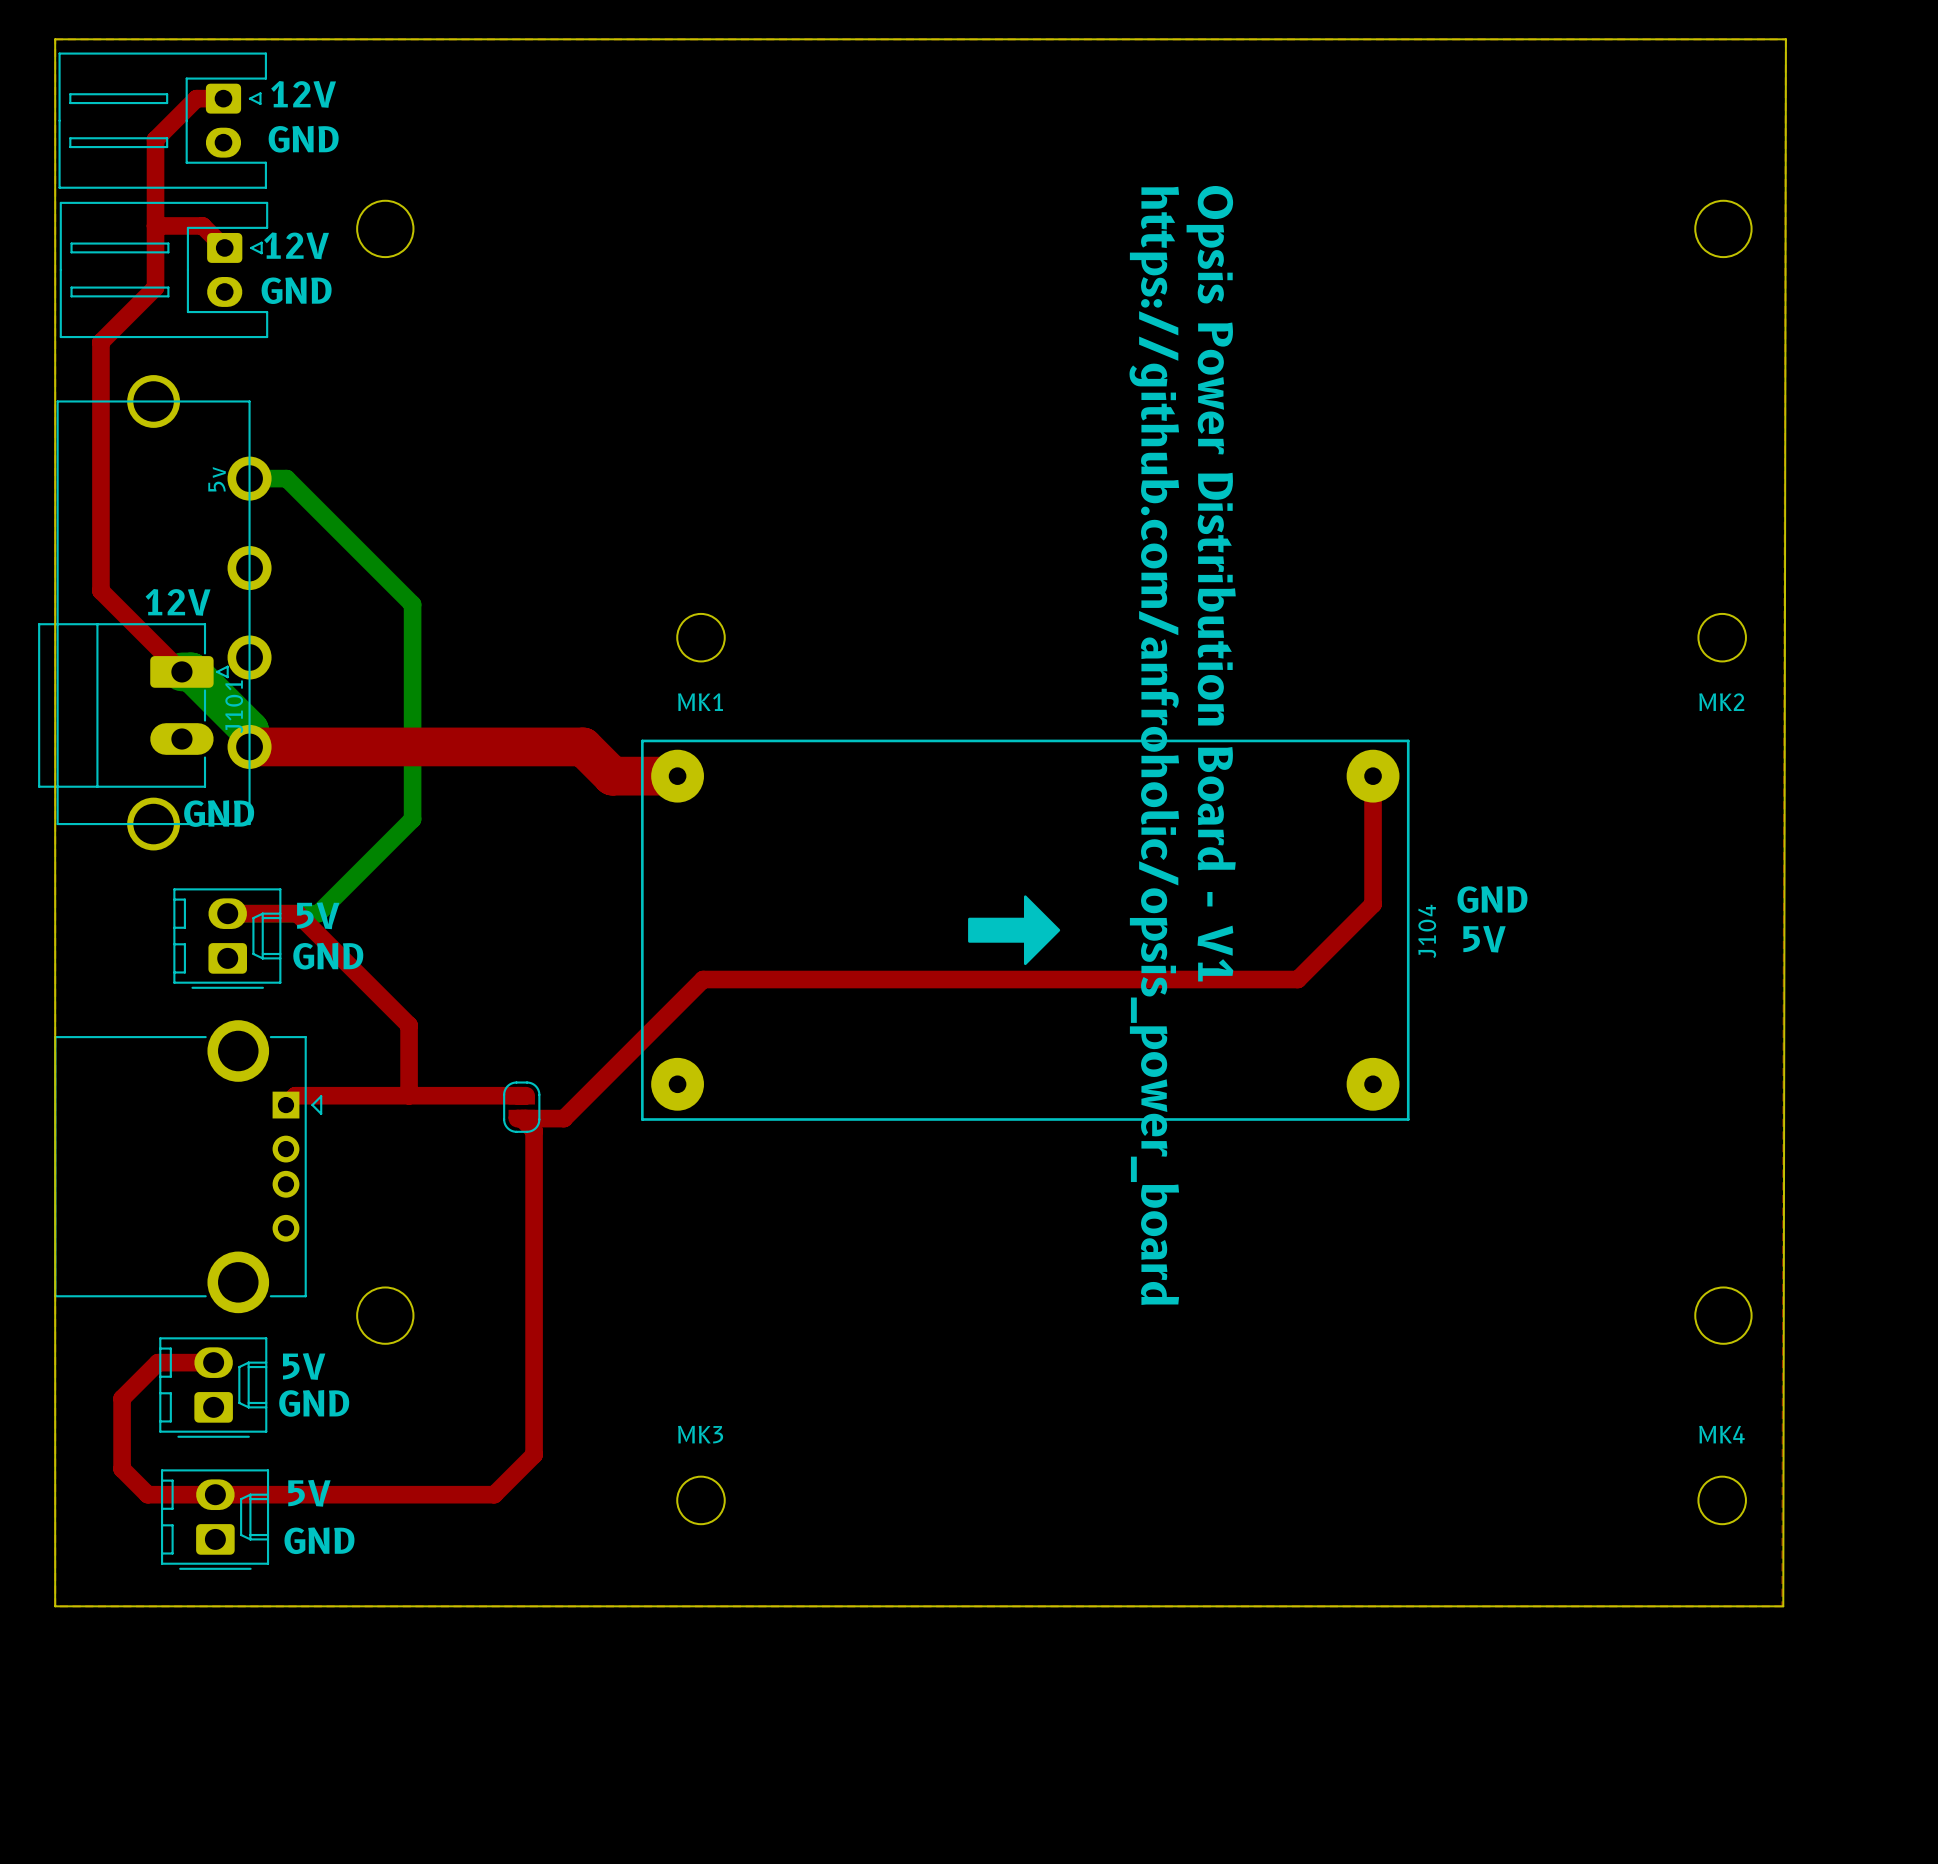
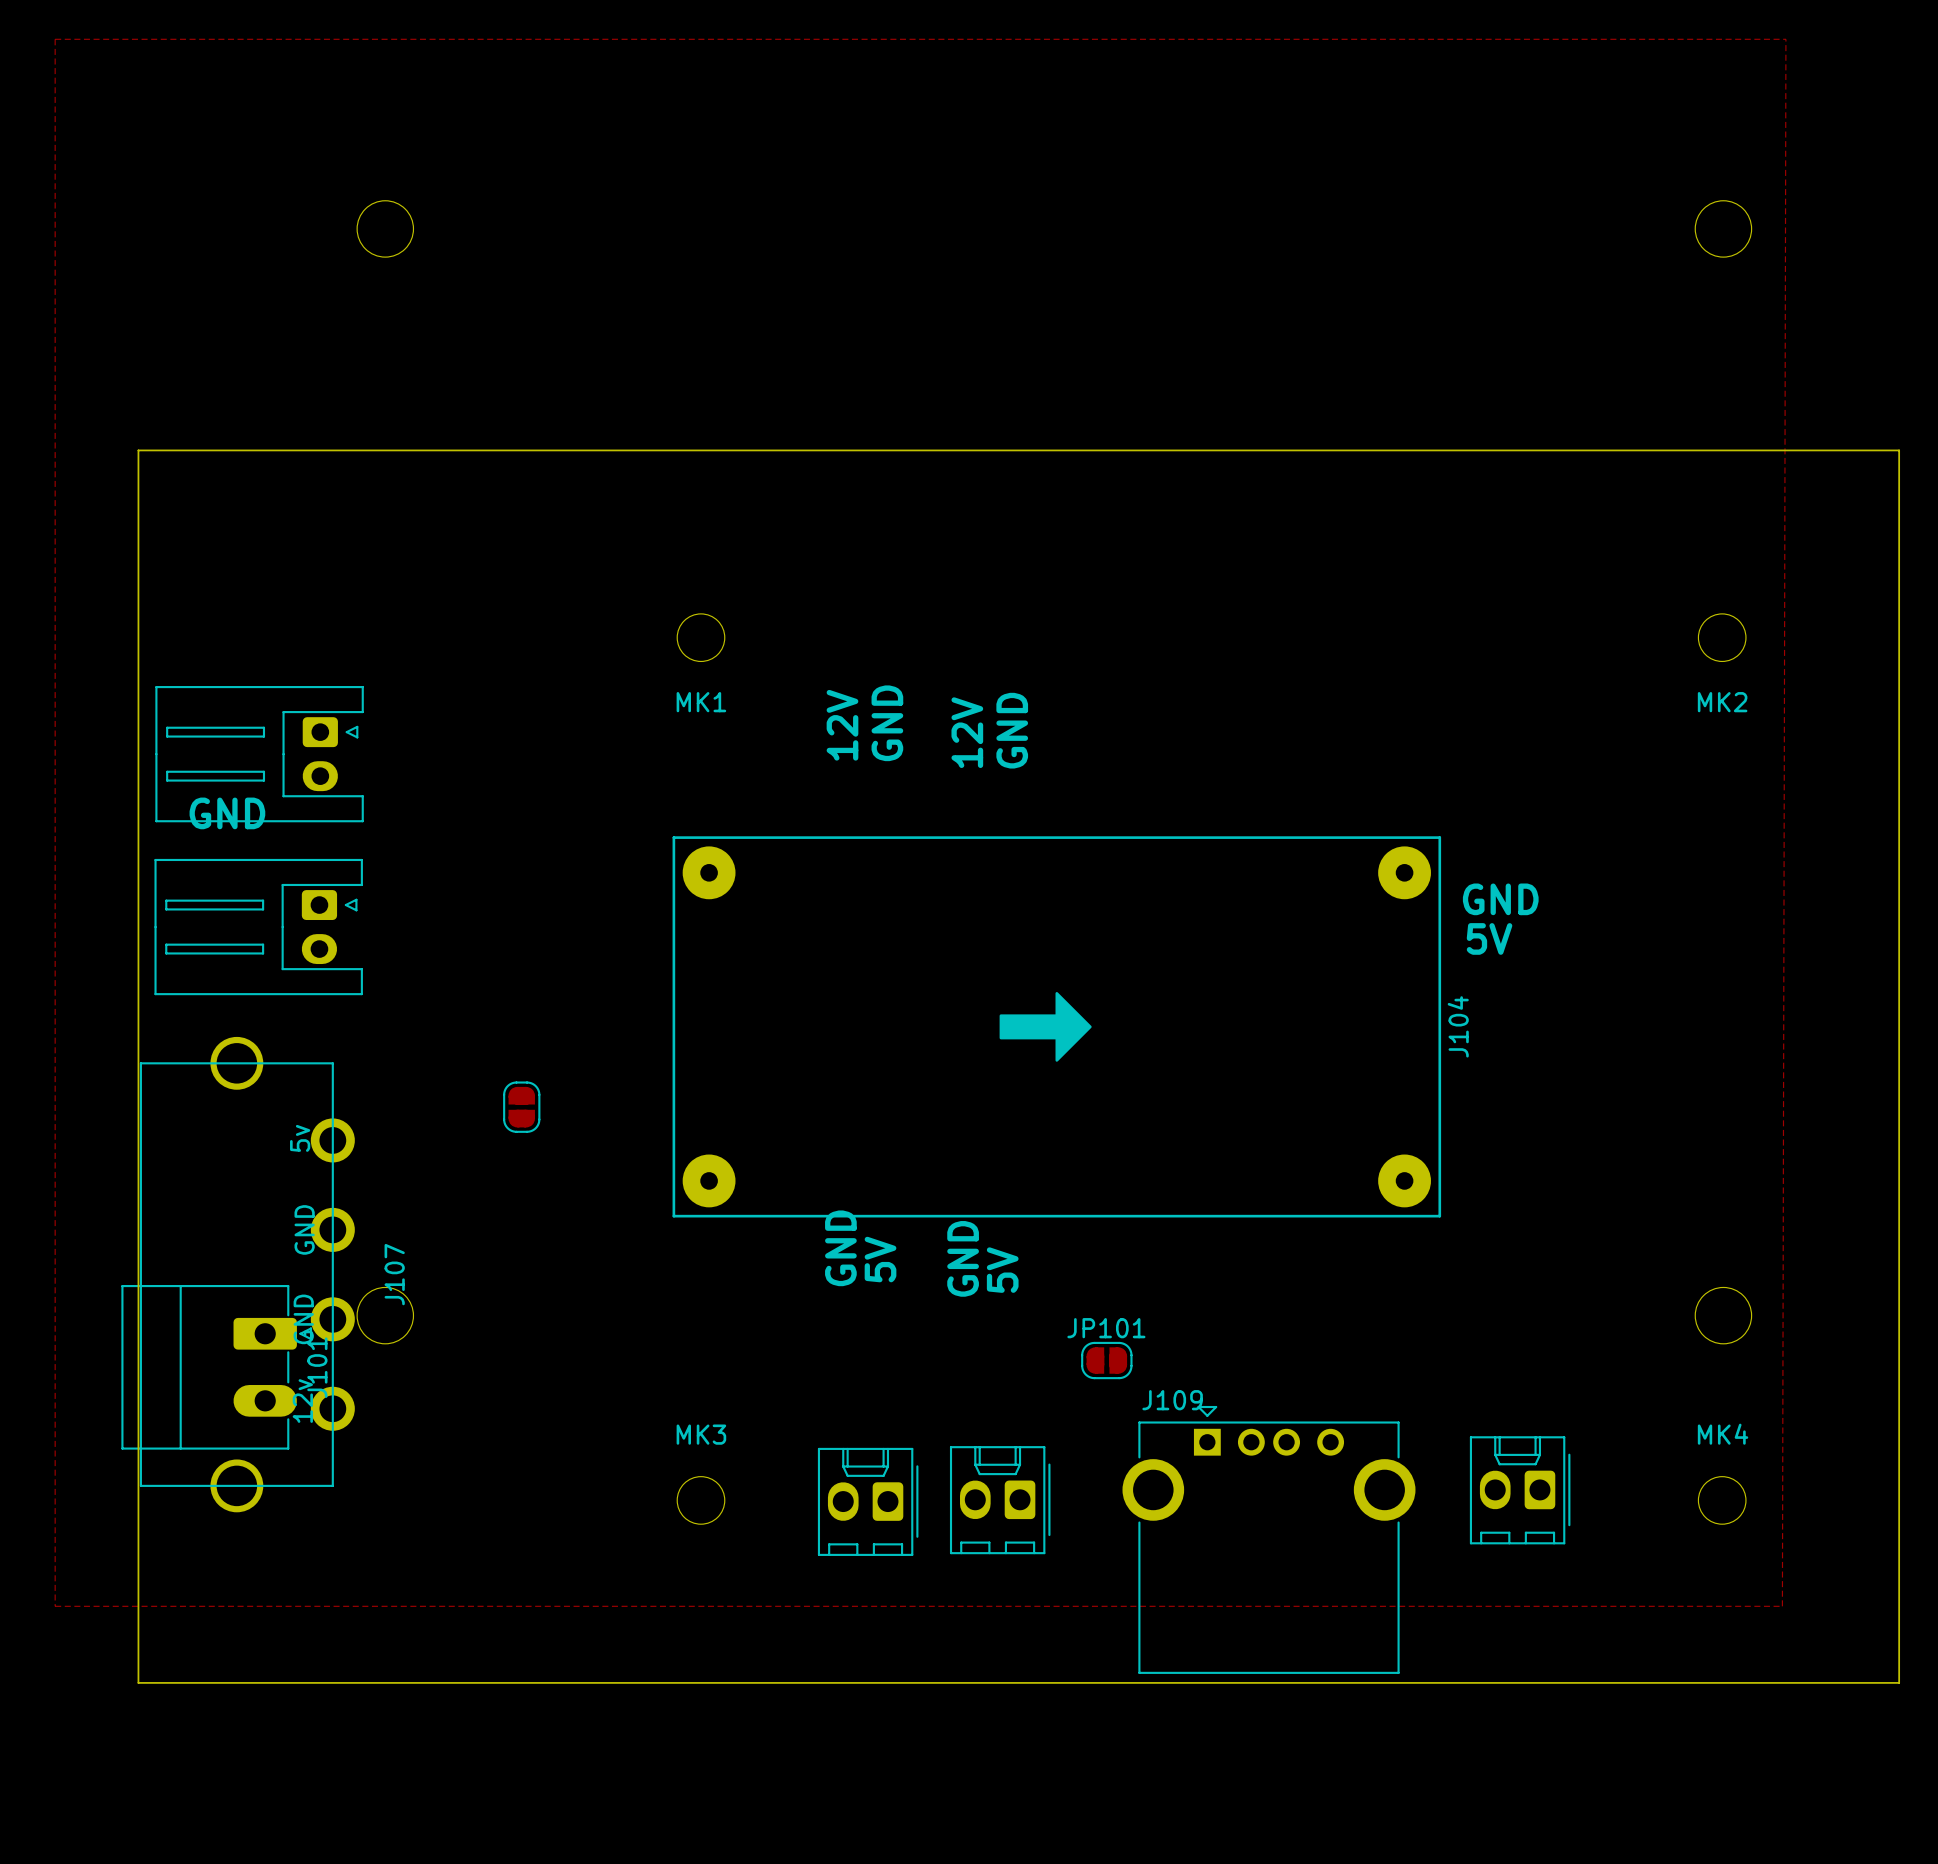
board edge: (55, 39) (1785, 39) (1783, 1606) (55, 1606) (55, 39) -> (138, 450) (138, 1682) (1899, 1682) (1899, 450) (138, 450)
text: 12V (303, 94) -> none
top track: (223, 98) (196, 98) (155, 139) (155, 287) (100, 342) (100, 590) (181, 671) -> none
part: (162, 120) -> none
text: GND (303, 139) -> none
top track: (155, 225) (202, 225) (224, 247) -> none
text: 12V (296, 245) -> none
part: (163, 269) -> none
text: GND (296, 290) -> none
bottom track: (249, 478) (286, 478) (412, 604) (412, 819) (318, 913) (227, 913) -> none
text: Opsis Power Distribution Board - V1 (1211, 583) -> none
text: 12V (178, 602) -> none
part: (164, 612) -> none
bottom track: (181, 671) (191, 671) (249, 730) (249, 746) -> none
J101 position: (133, 705) -> (216, 1367)
text: none -> 12V (842, 725)
text: none -> GND (887, 723)
text: none -> GND (1012, 730)
text: none -> 12V (967, 732)
text: https://github.com/anfroholic/opsis_power_board (1154, 745) -> none
top track: (249, 746) (583, 746) (612, 776) (677, 776) -> none
part: none -> (259, 754)
top track: (1373, 776) (1373, 904) (1297, 979) (703, 979) (564, 1118) (521, 1118) (534, 1130) (534, 1454) (494, 1494) (147, 1494) (122, 1468) (122, 1398) (157, 1362) (213, 1362) -> none
top track: (227, 913) (297, 913) (409, 1025) (409, 1095) -> none
text: 5V (318, 915) -> none
part: none -> (258, 927)
J104 position: (1025, 930) -> (1056, 1026)
part: (227, 938) -> none
text: GND (328, 956) -> none
top track: (521, 1095) (295, 1095) (285, 1105) -> none
part: (188, 1166) -> none
text: none -> GND (840, 1248)
text: none -> 5V (880, 1259)
text: none -> GND (963, 1258)
J107: none -> (247, 1274)
text: none -> 5V (1002, 1270)
JP101: none -> (1106, 1360)
text: 5V (304, 1366) -> none
part: (213, 1387) -> none
text: GND (314, 1403) -> none
part: none -> (1520, 1490)
text: 5V (309, 1493) -> none
part: none -> (1000, 1500)
part: none -> (868, 1501)
part: (215, 1519) -> none
J109: none -> (1268, 1539)
text: GND (319, 1540) -> none

